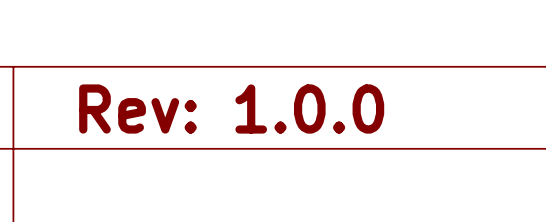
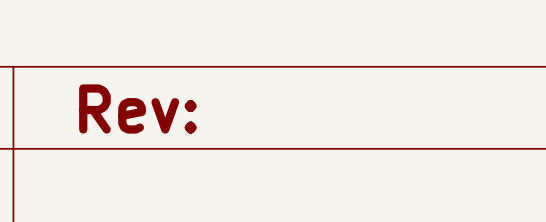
title block: Rev: 1.0.0 (231, 109) -> Rev: (137, 109)

